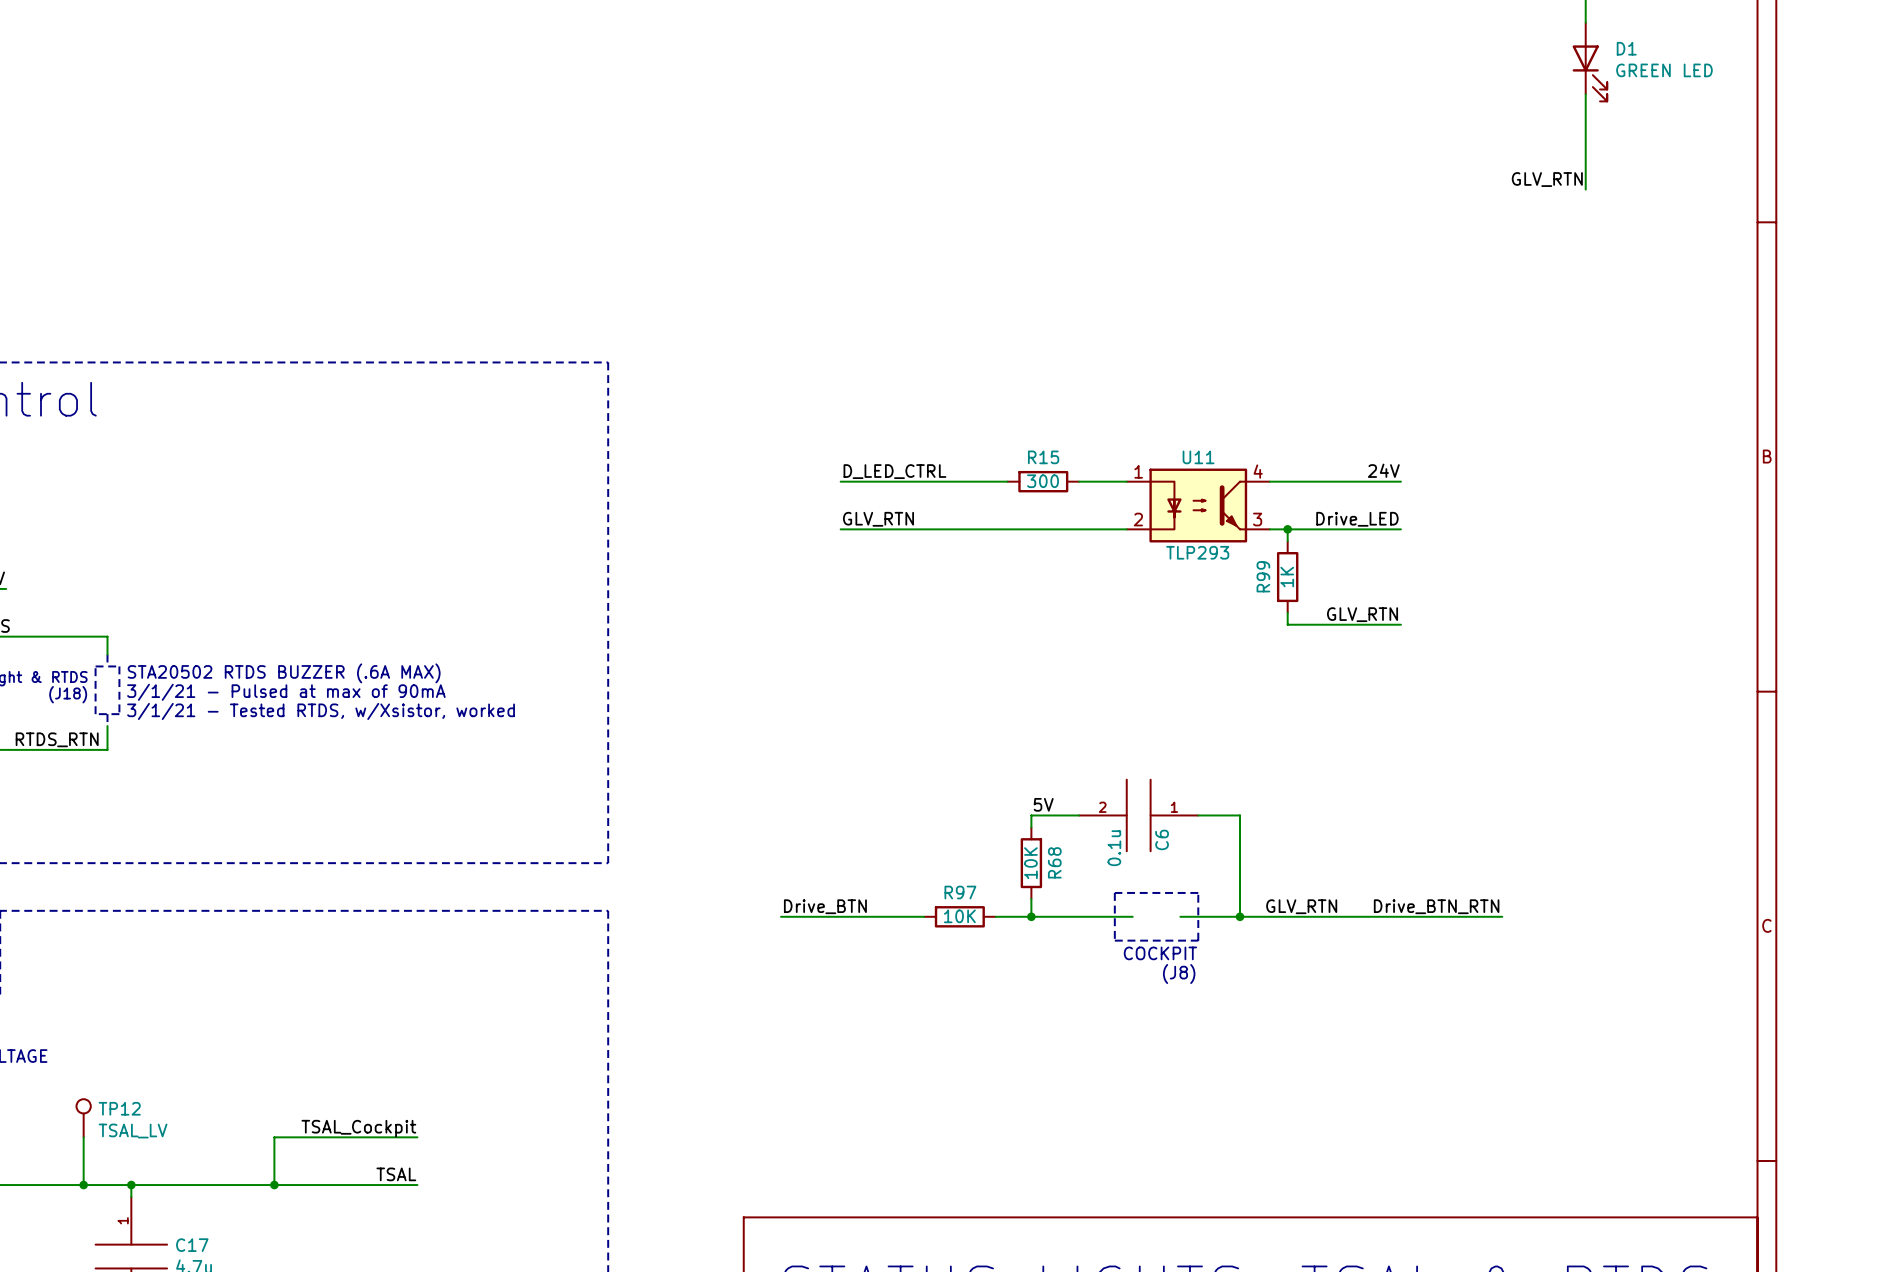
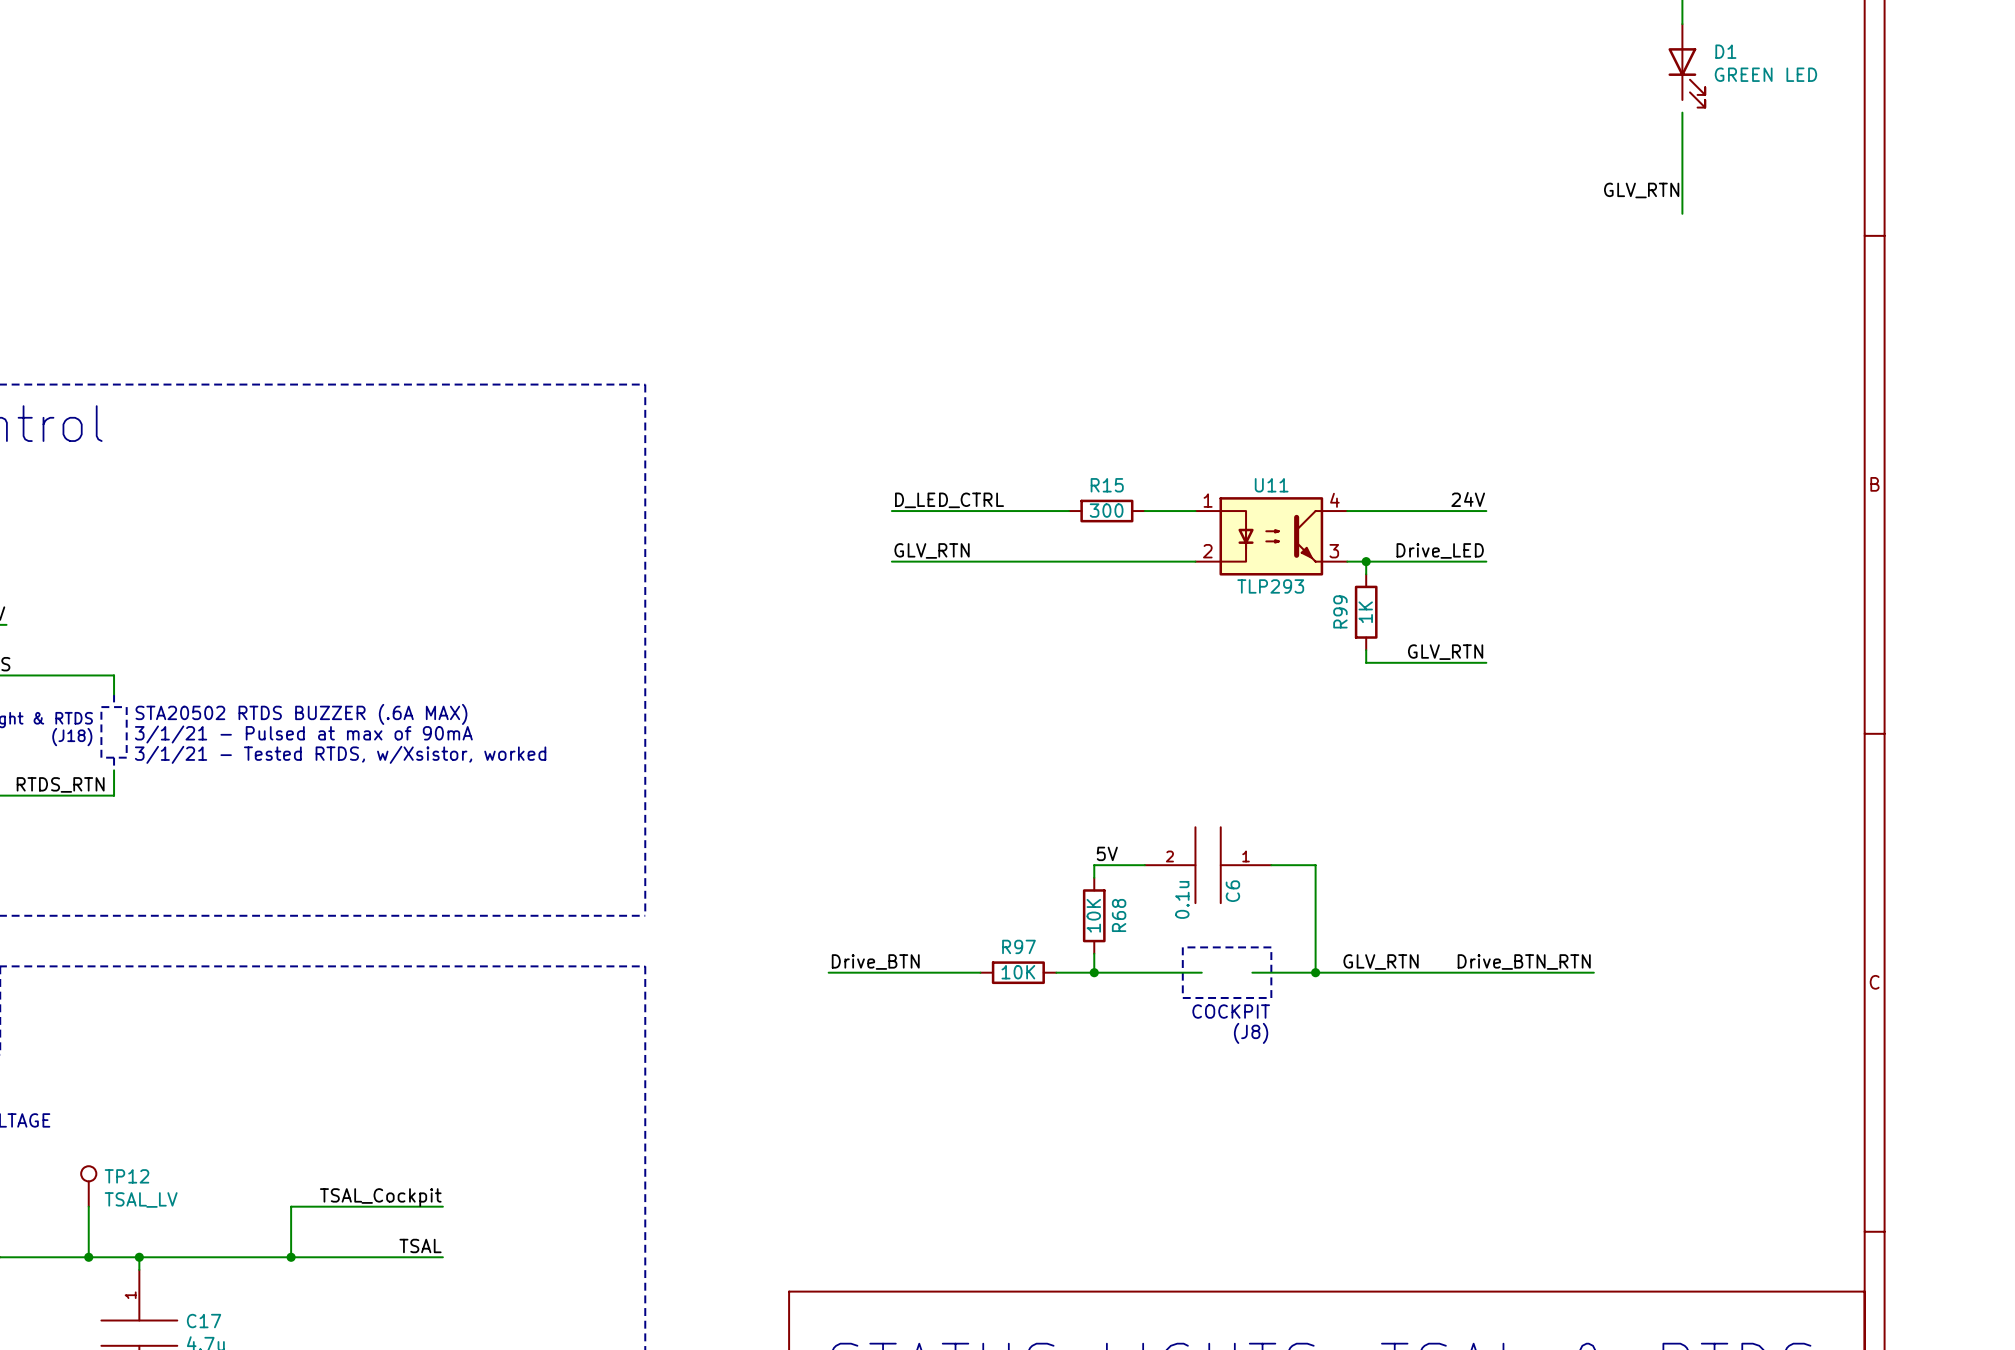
wire: (1585, 94) (1585, 106) -> (1682, 201) (1682, 213)

